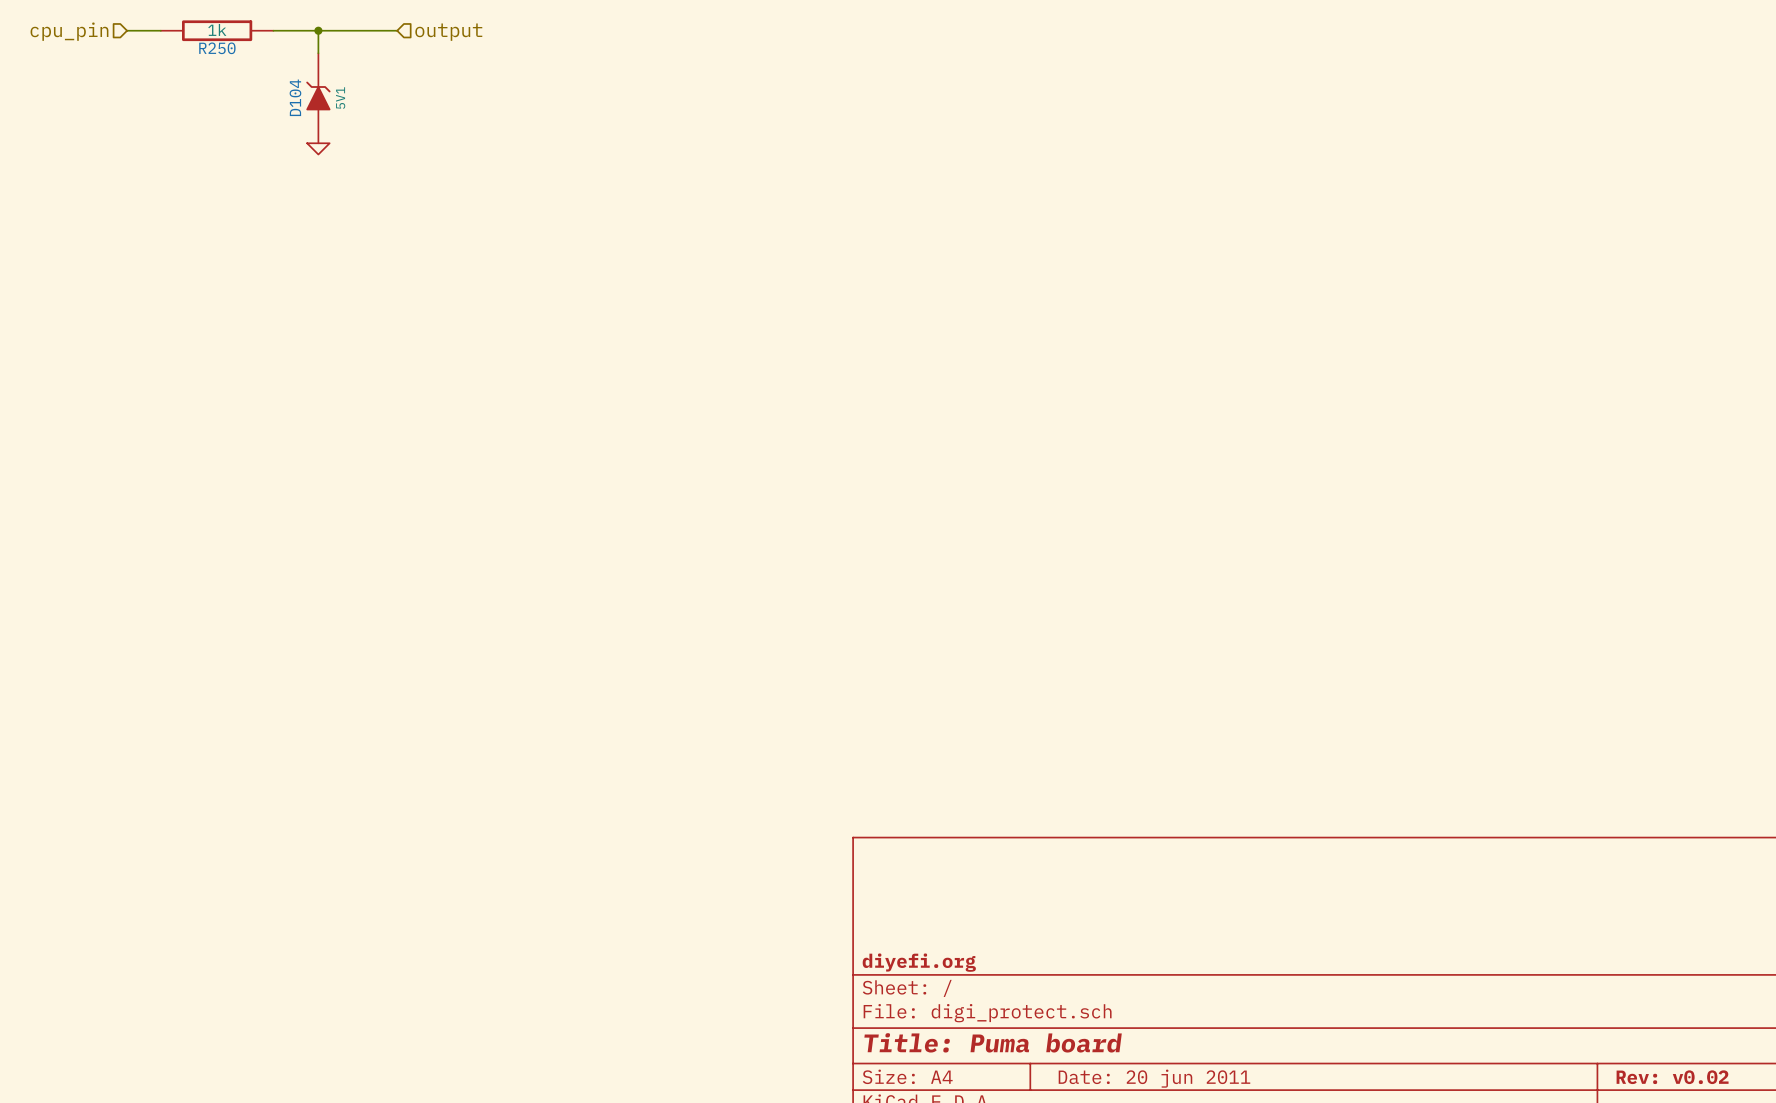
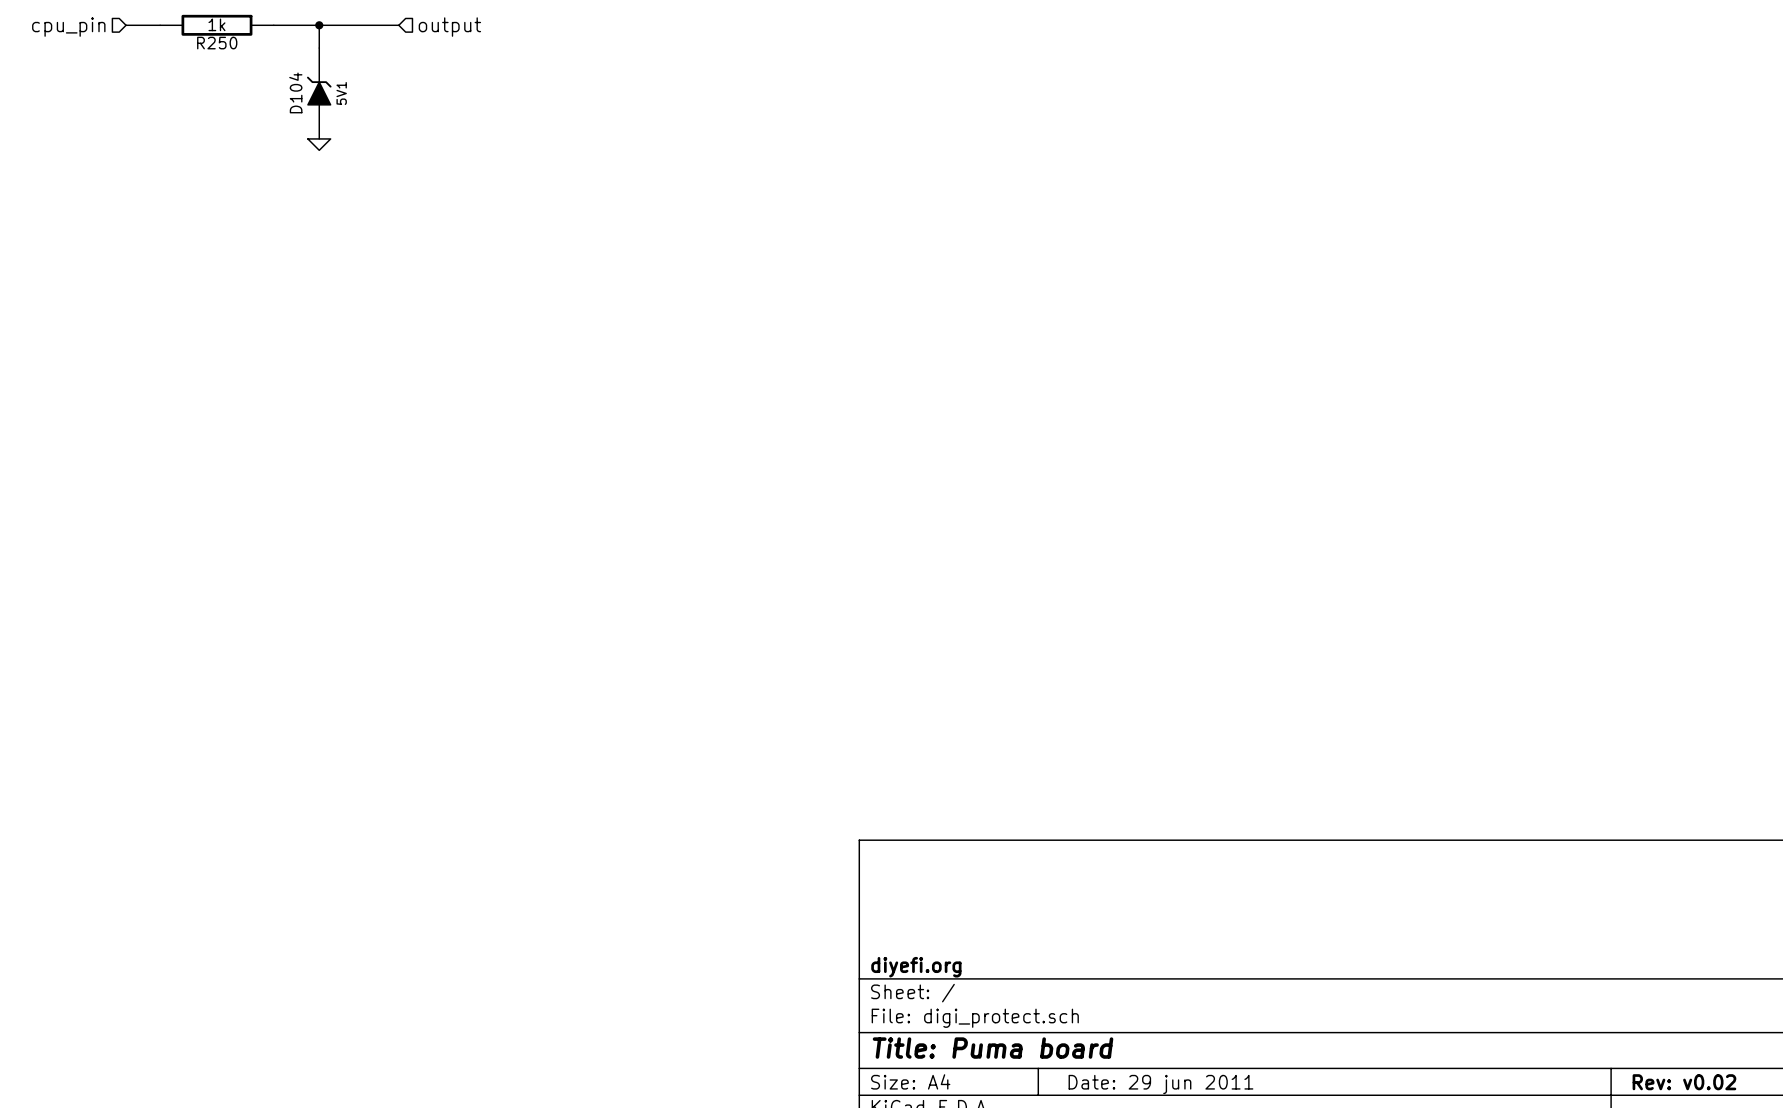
title block: Date: 20 jun 2011 (1154, 1078) -> Date: 29 jun 2011 (1160, 1084)

